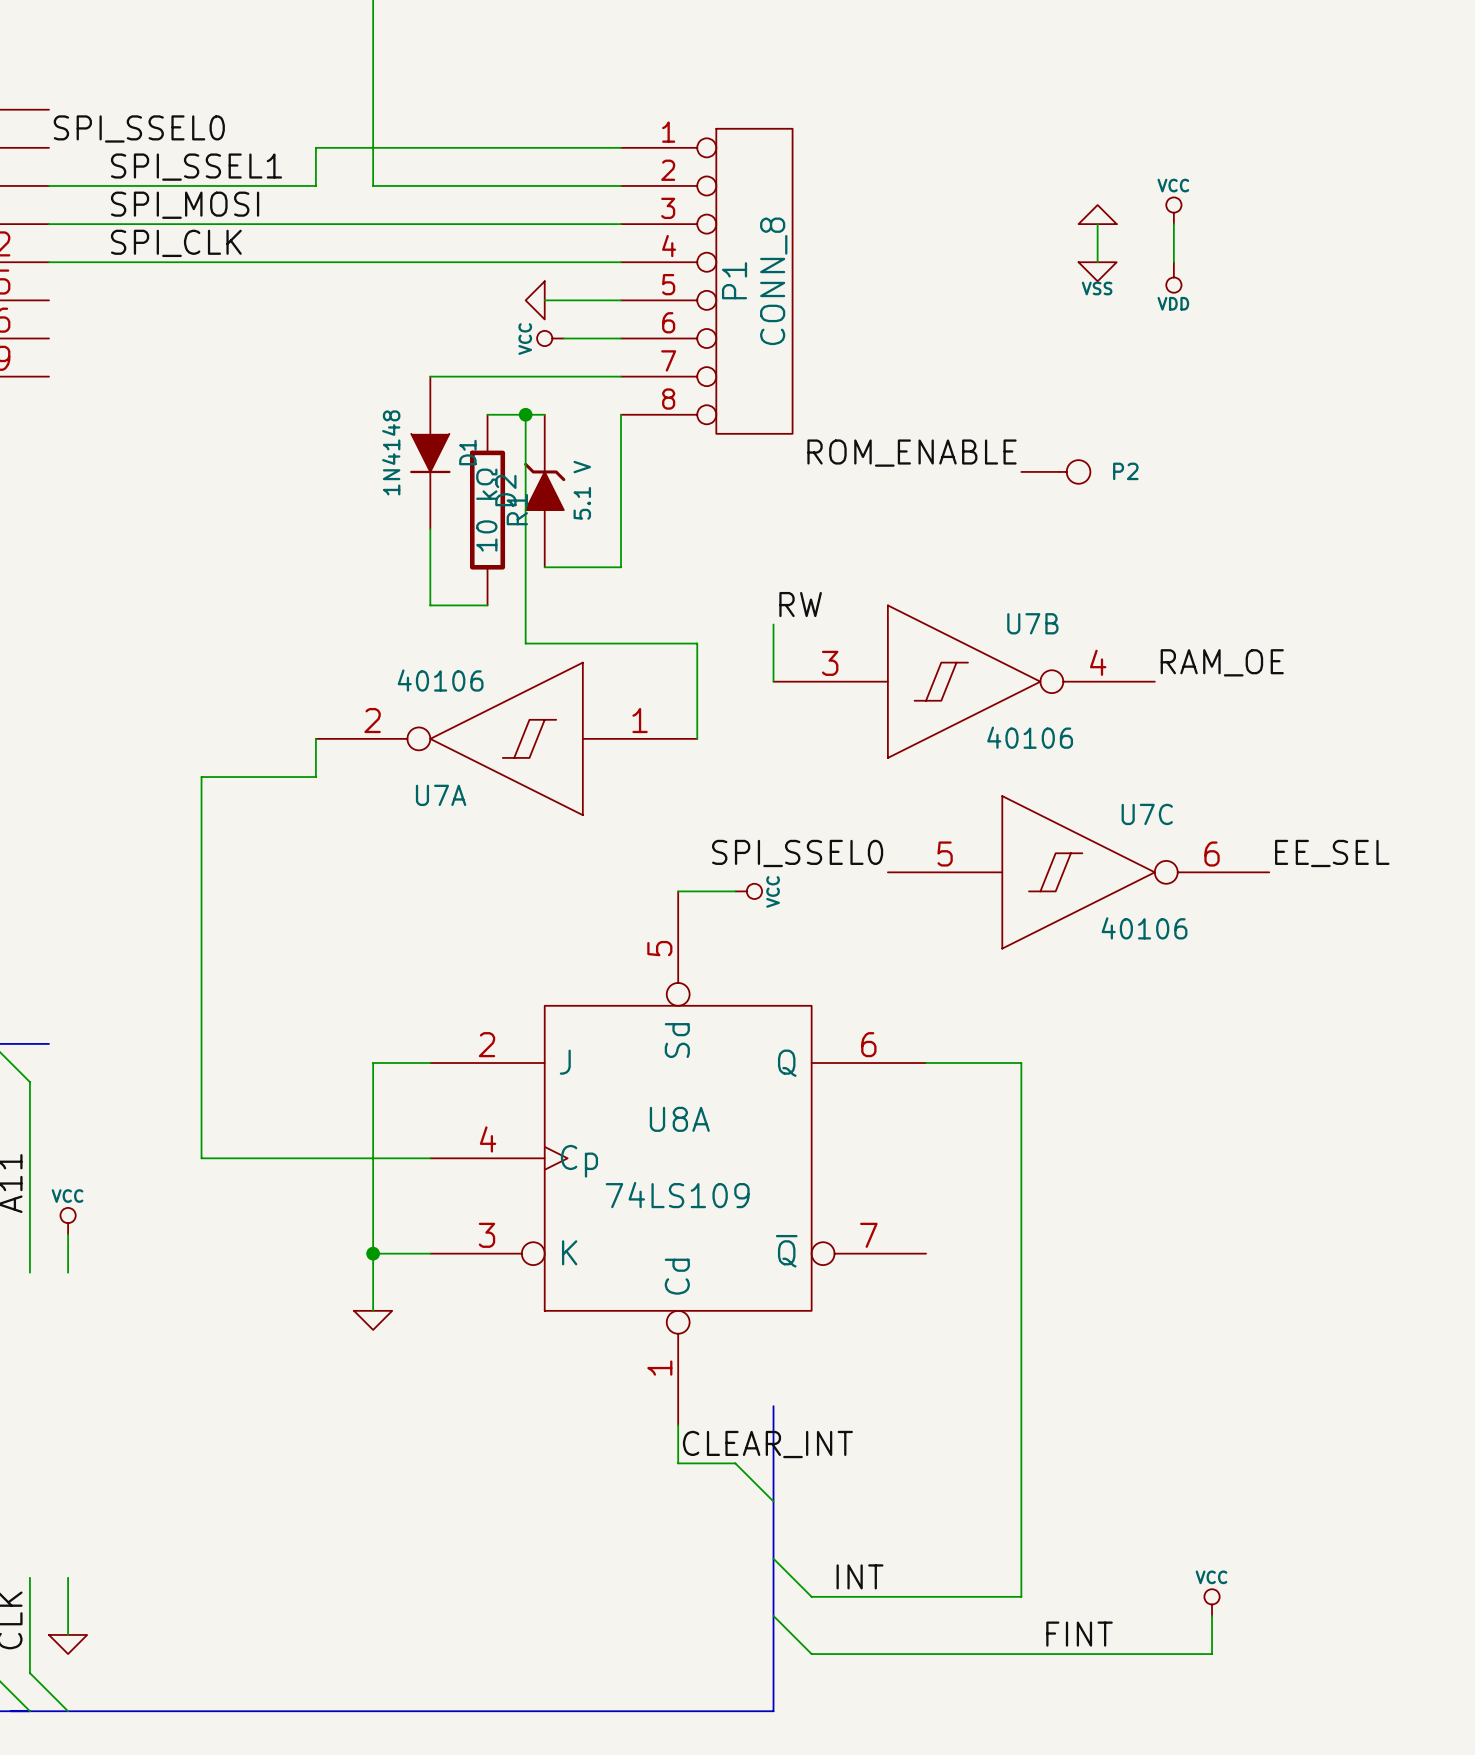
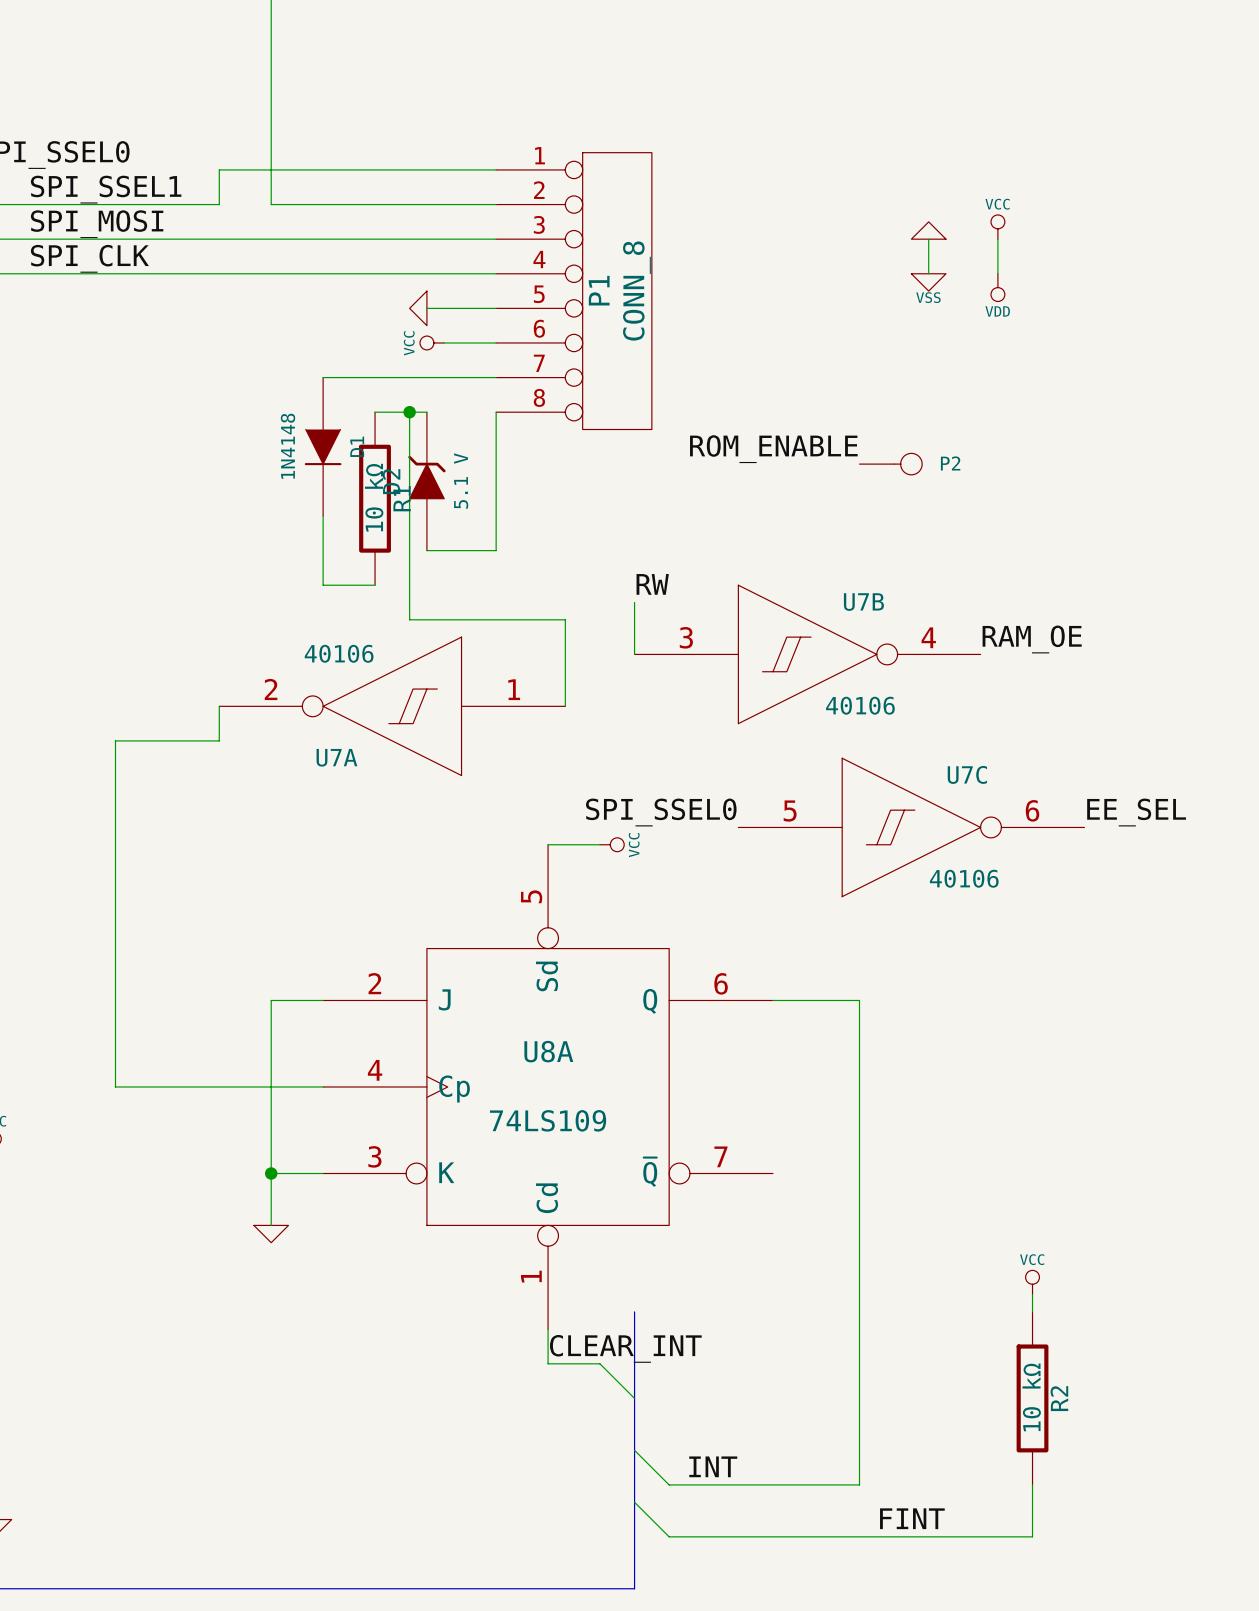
wire: none -> (1032, 1294) (1032, 1311)
R2: none -> 10 kΩ (1032, 1398)
power symbol position: VCC (1212, 1602) -> VCC (1032, 1282)

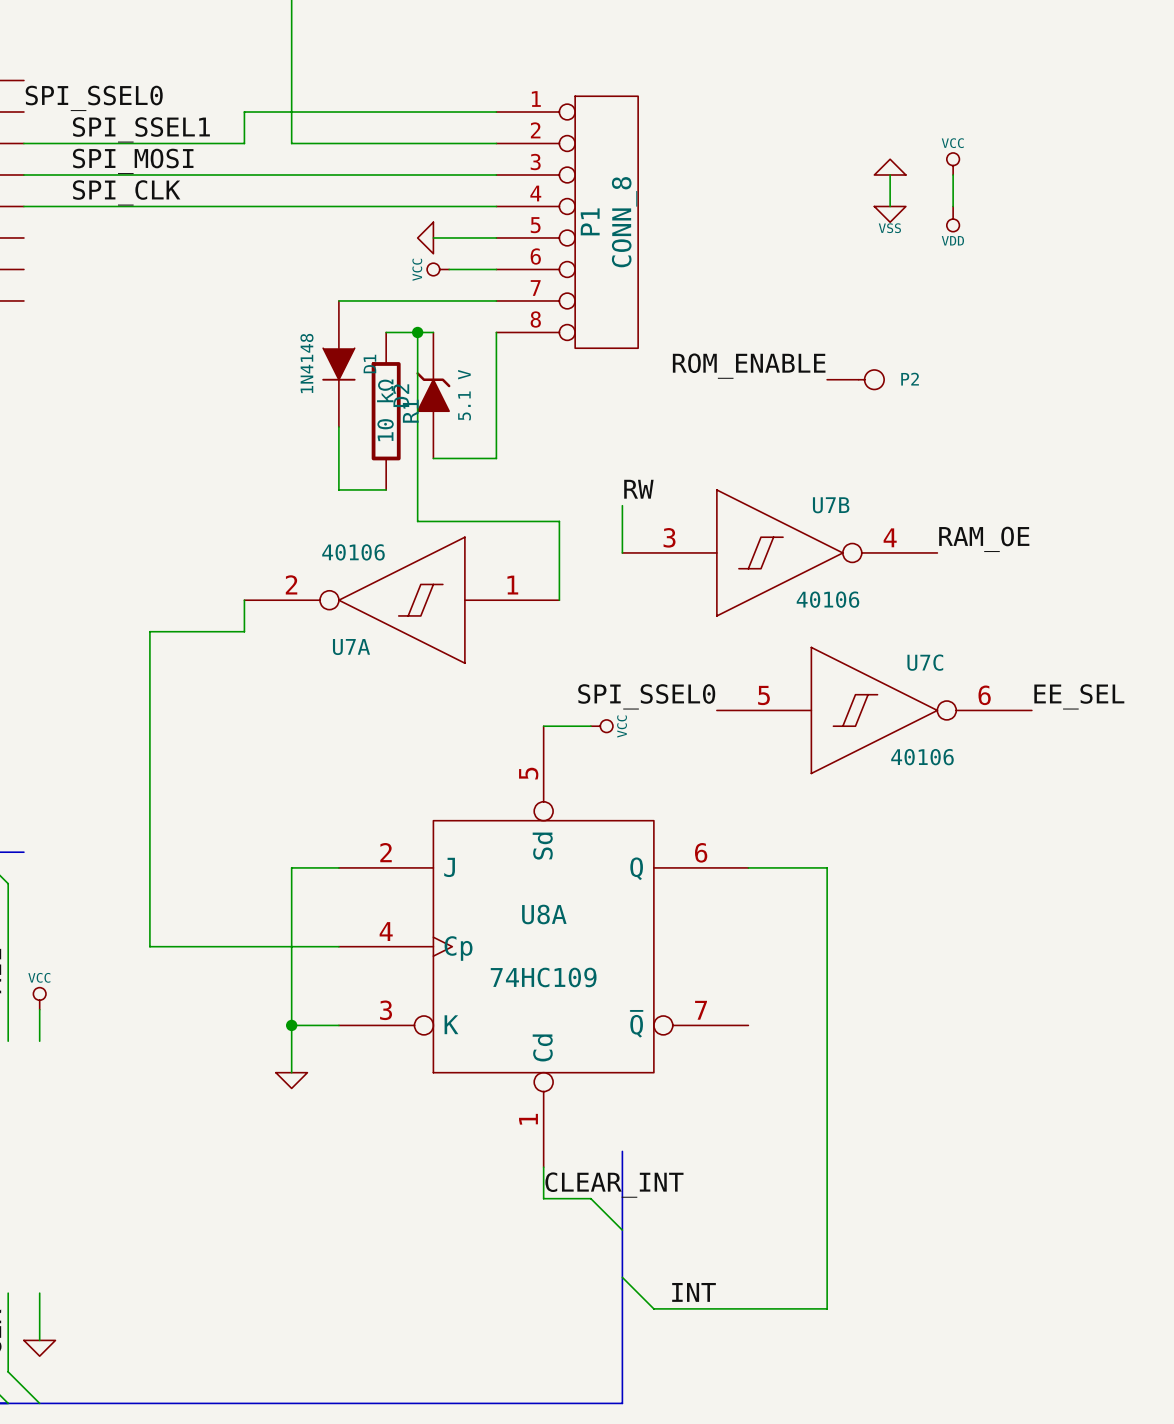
U8A value: 74LS109 (548, 1120) -> 74HC109 (543, 977)
power symbol: VCC (1032, 1282) -> none
wire: (1032, 1294) (1032, 1311) -> none
R2: 10 kΩ (1032, 1398) -> none
wire: (1032, 1484) (1032, 1536) (669, 1536) (634, 1502) -> none
label: FINT (912, 1518) -> none

